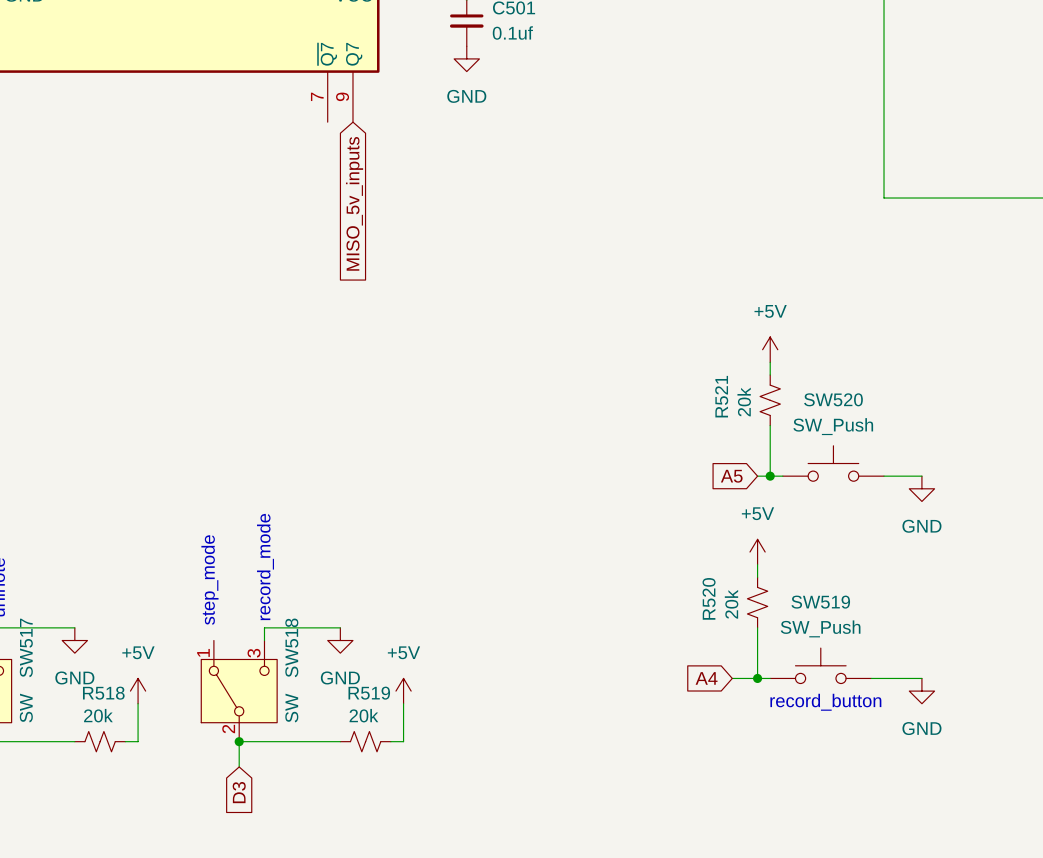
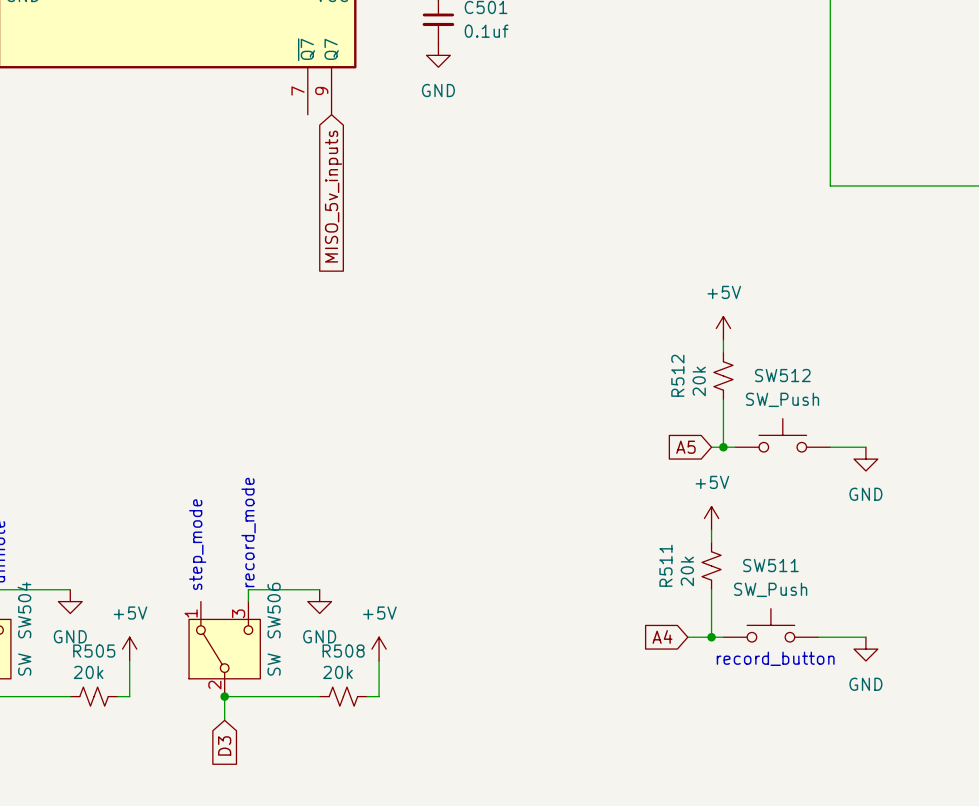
R521 name: R521 (721, 396) -> R512 (677, 375)
SW520 name: SW520 (833, 399) -> SW512 (782, 375)
R520 name: R520 (709, 598) -> R511 (665, 565)
SW519 name: SW519 (820, 602) -> SW511 (770, 565)
SW517 name: SW517 (26, 647) -> SW504 (24, 610)
SW518 name: SW518 (291, 647) -> SW506 (274, 610)
R518 name: R518 (103, 693) -> R505 (94, 651)
R519 name: R519 (369, 693) -> R508 (343, 651)

